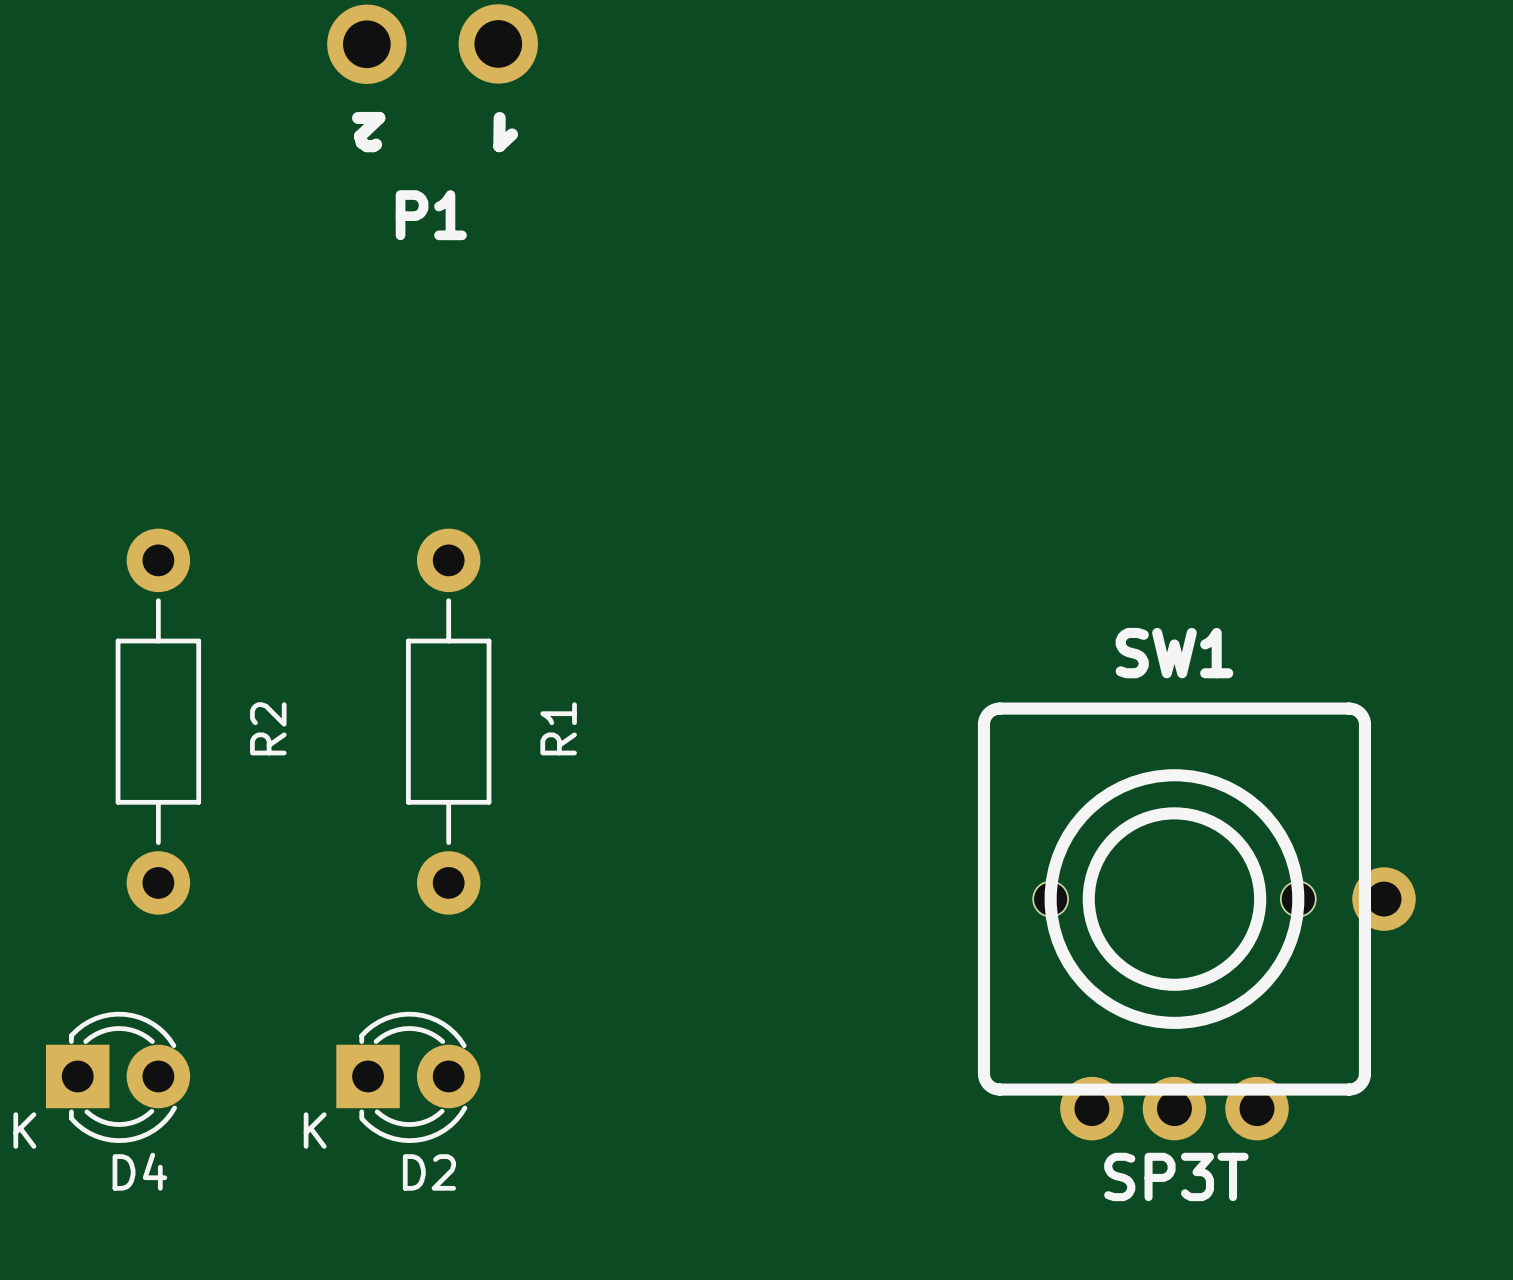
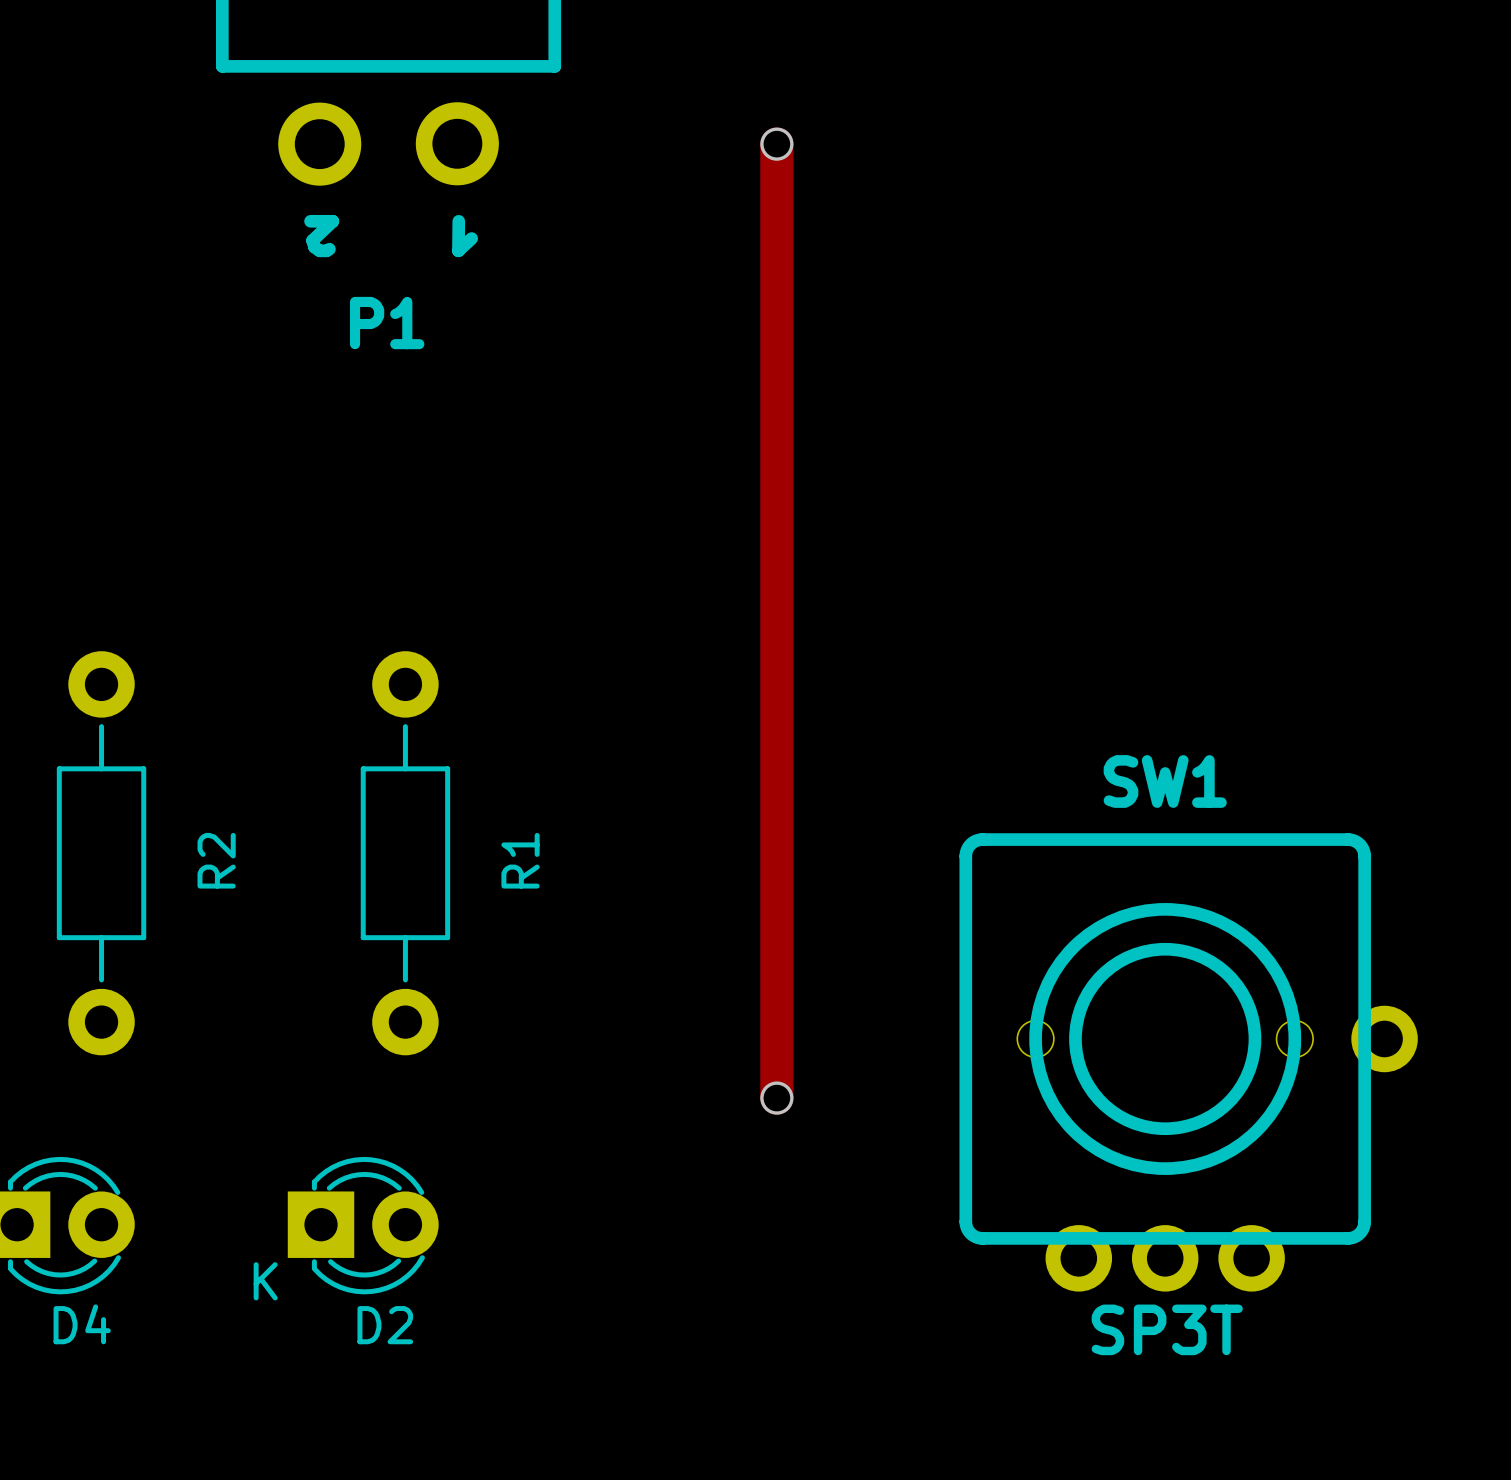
track: none -> (776, 144) (776, 1098)
via: none -> (776, 144)
via: none -> (776, 1098)

